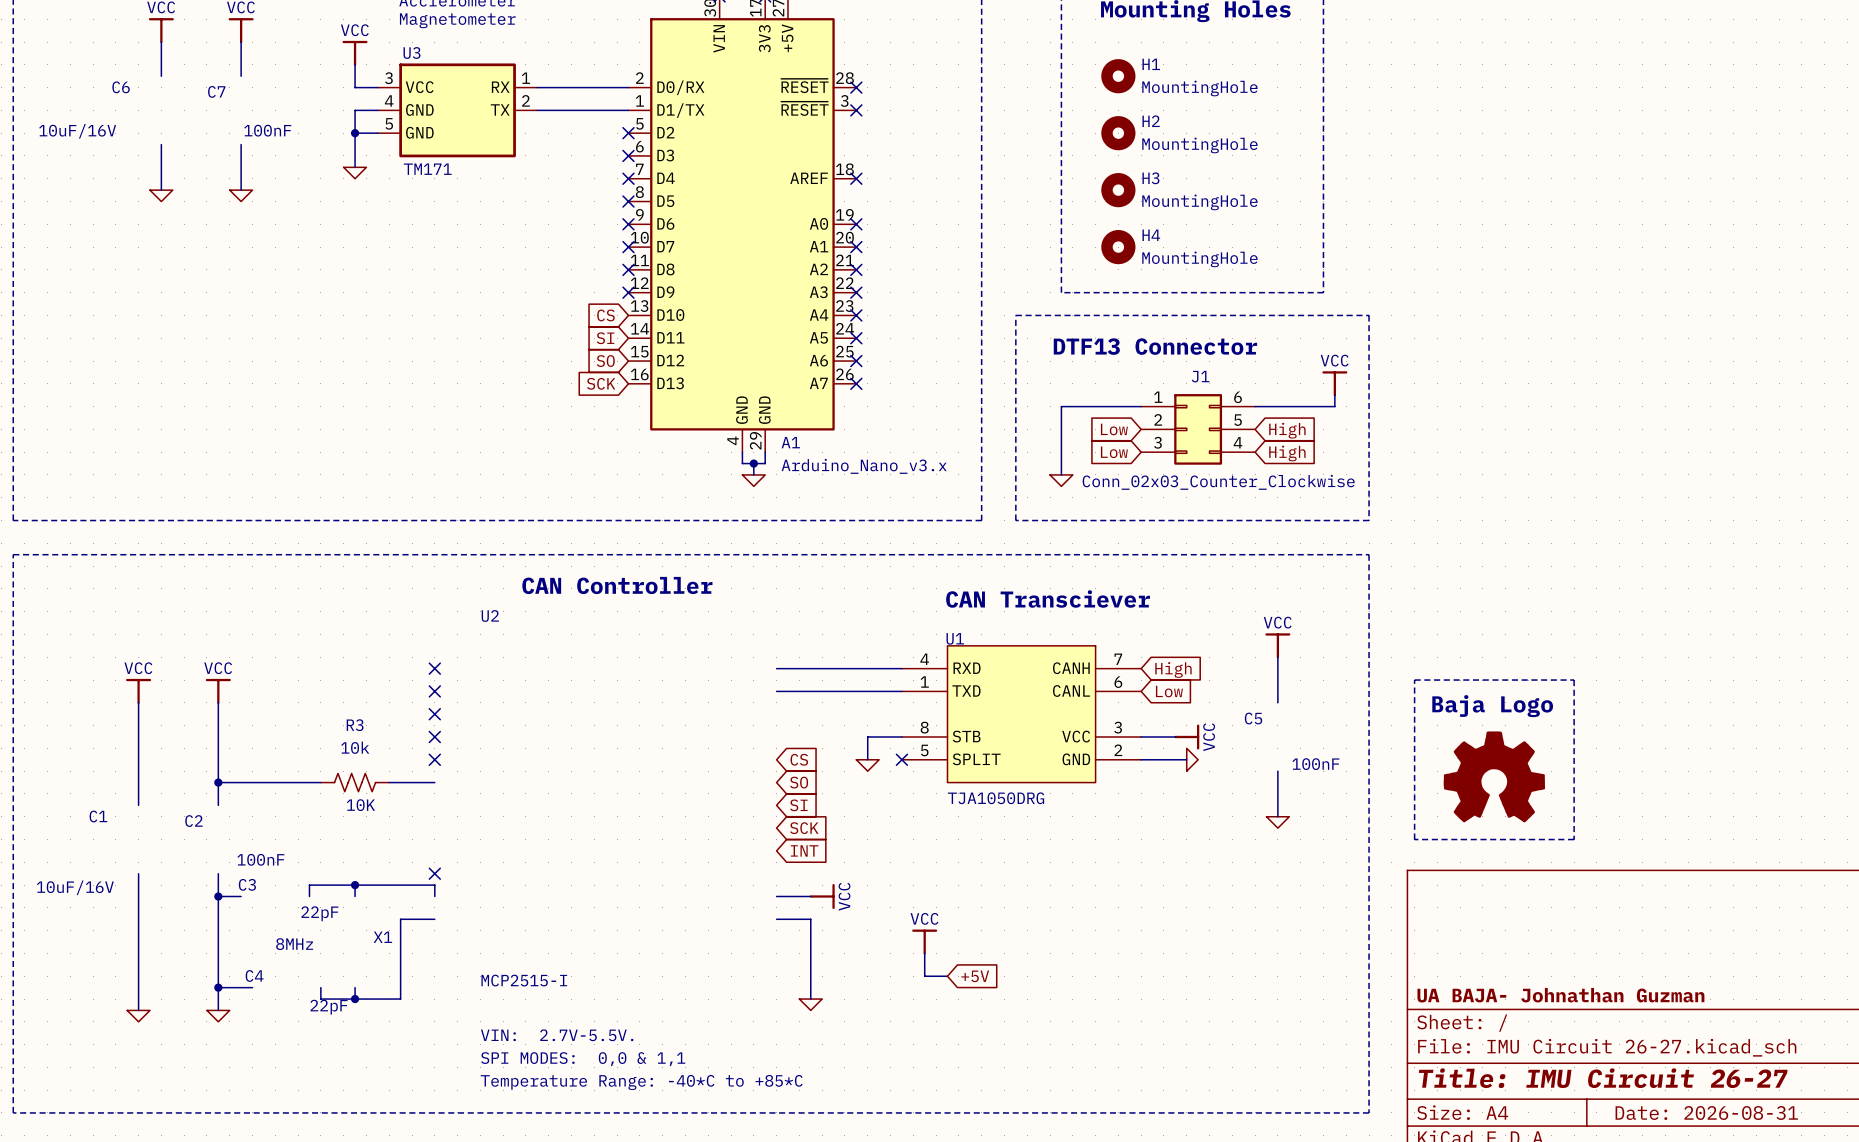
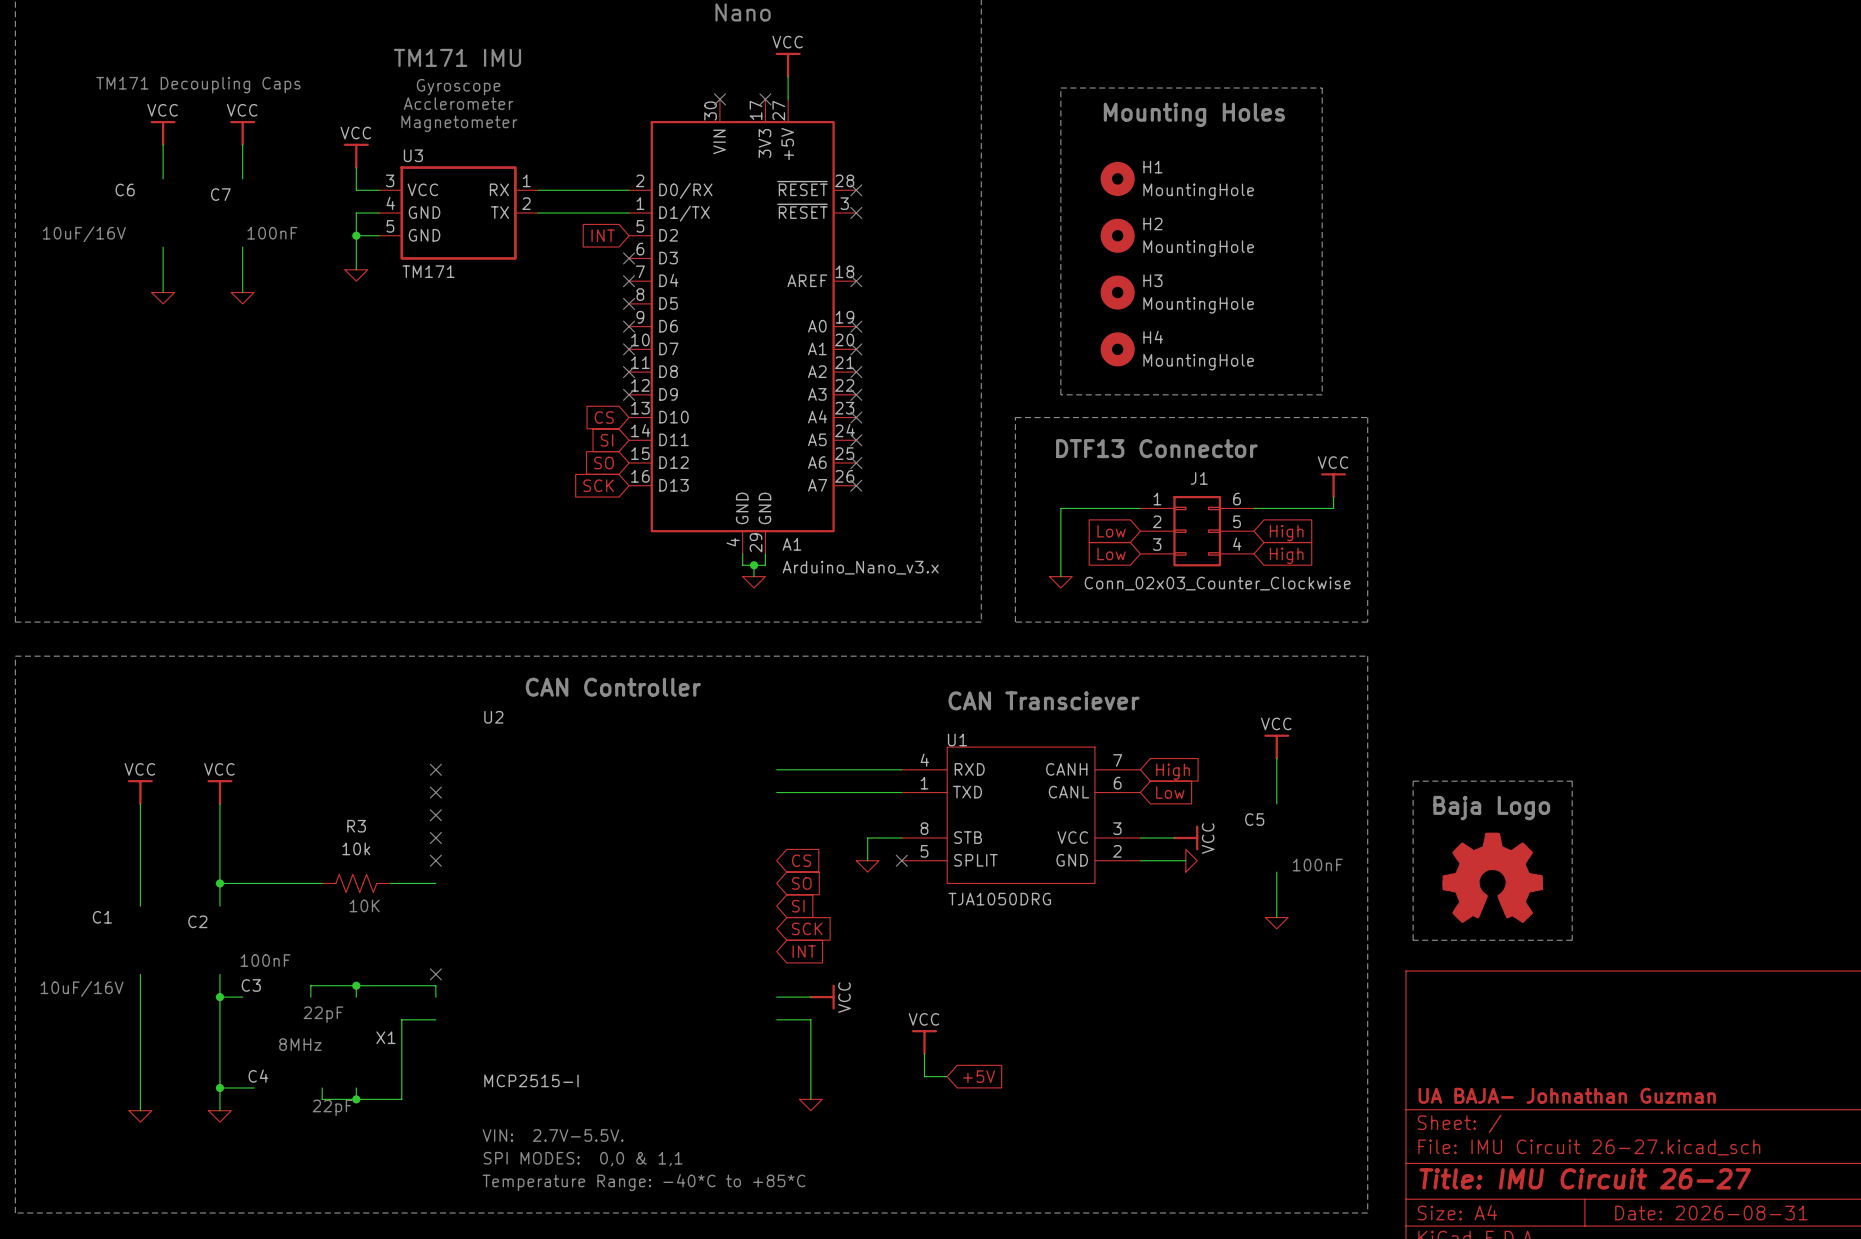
global label: none -> INT (603, 235)
no-connect mark: (628, 133) -> none

